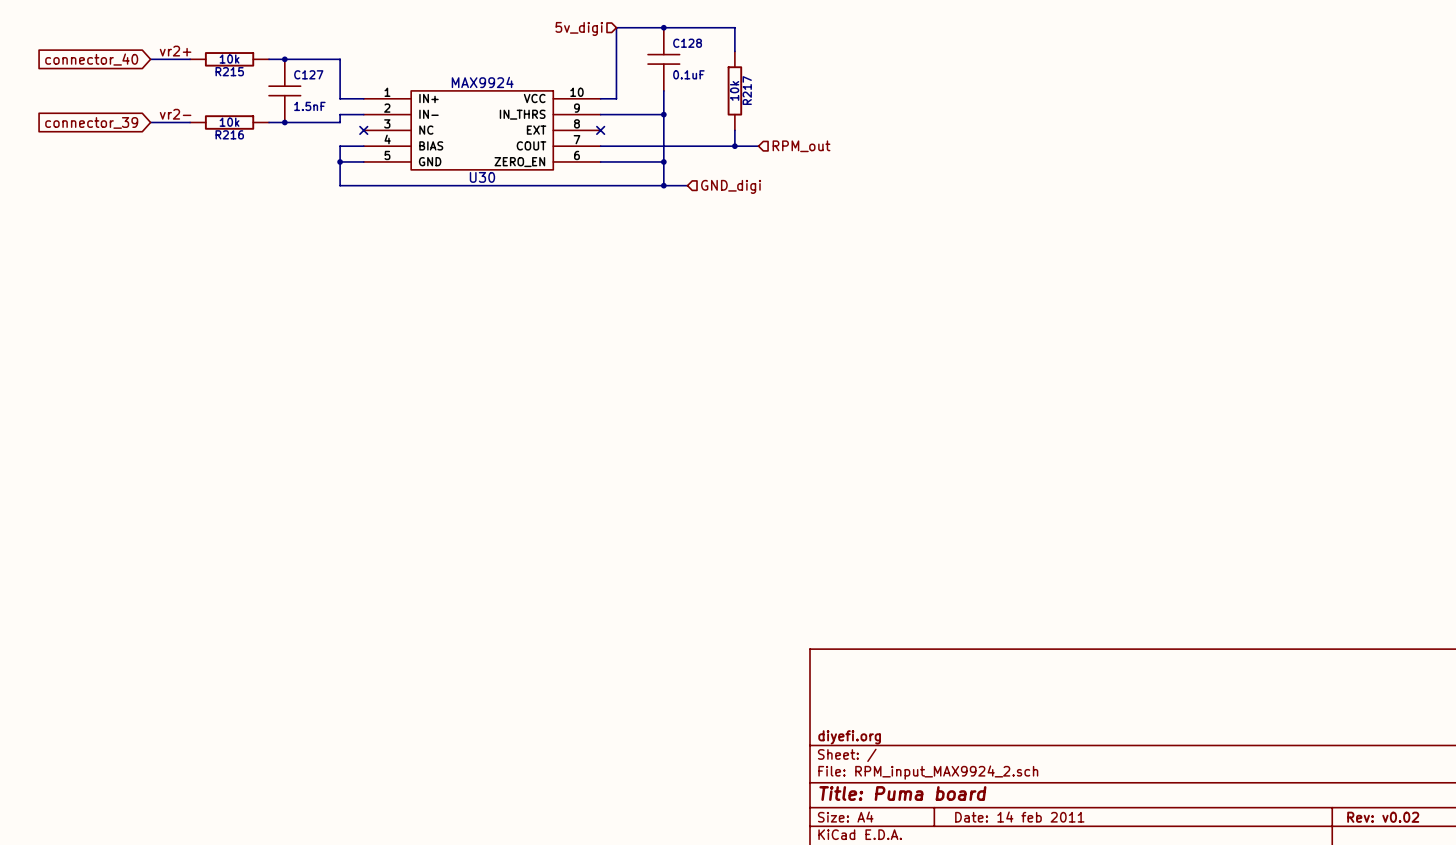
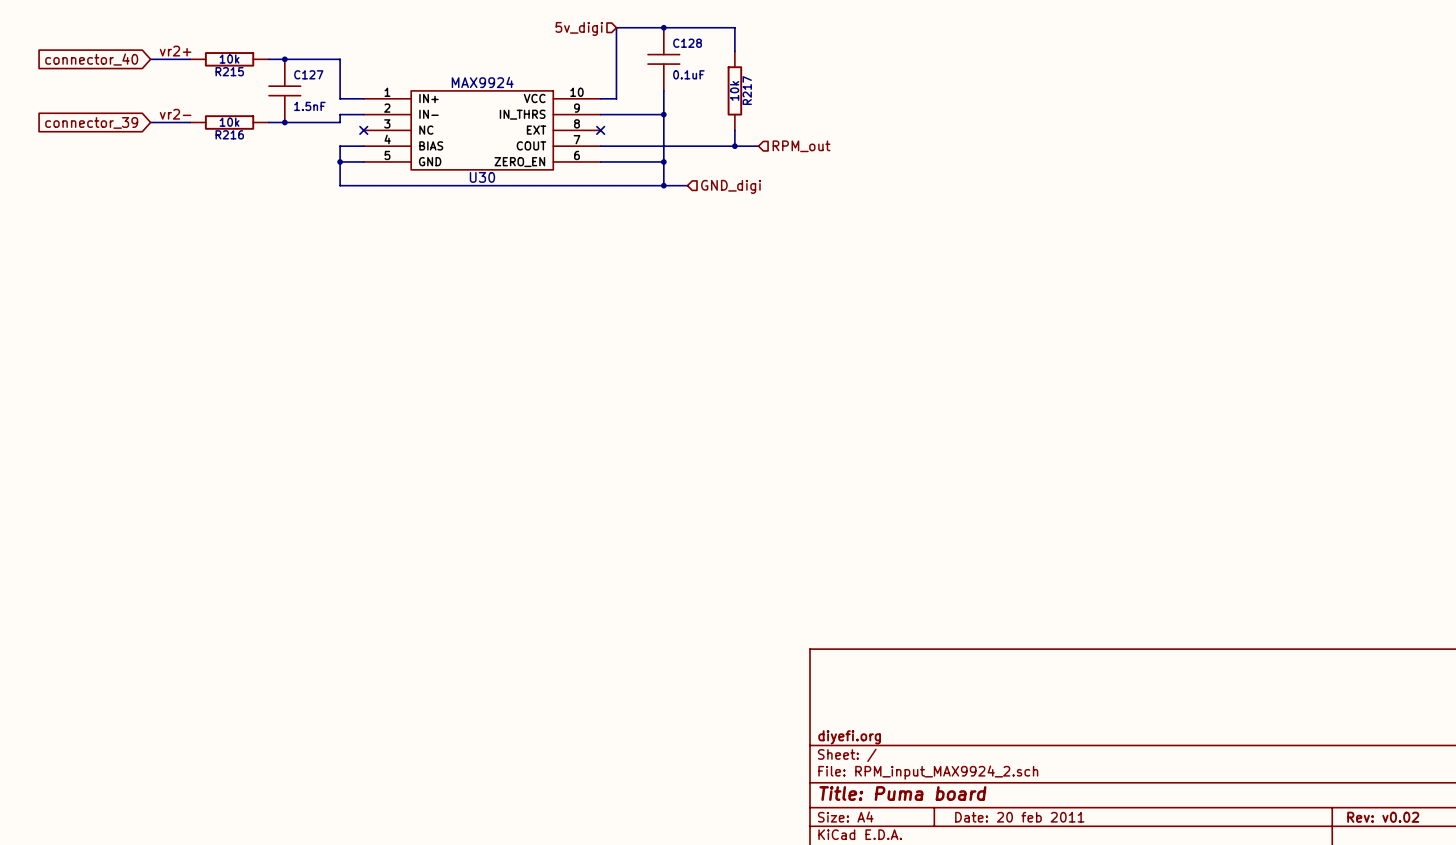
title block: Date: 14 feb 2011 (1019, 817) -> Date: 20 feb 2011 (1019, 817)

